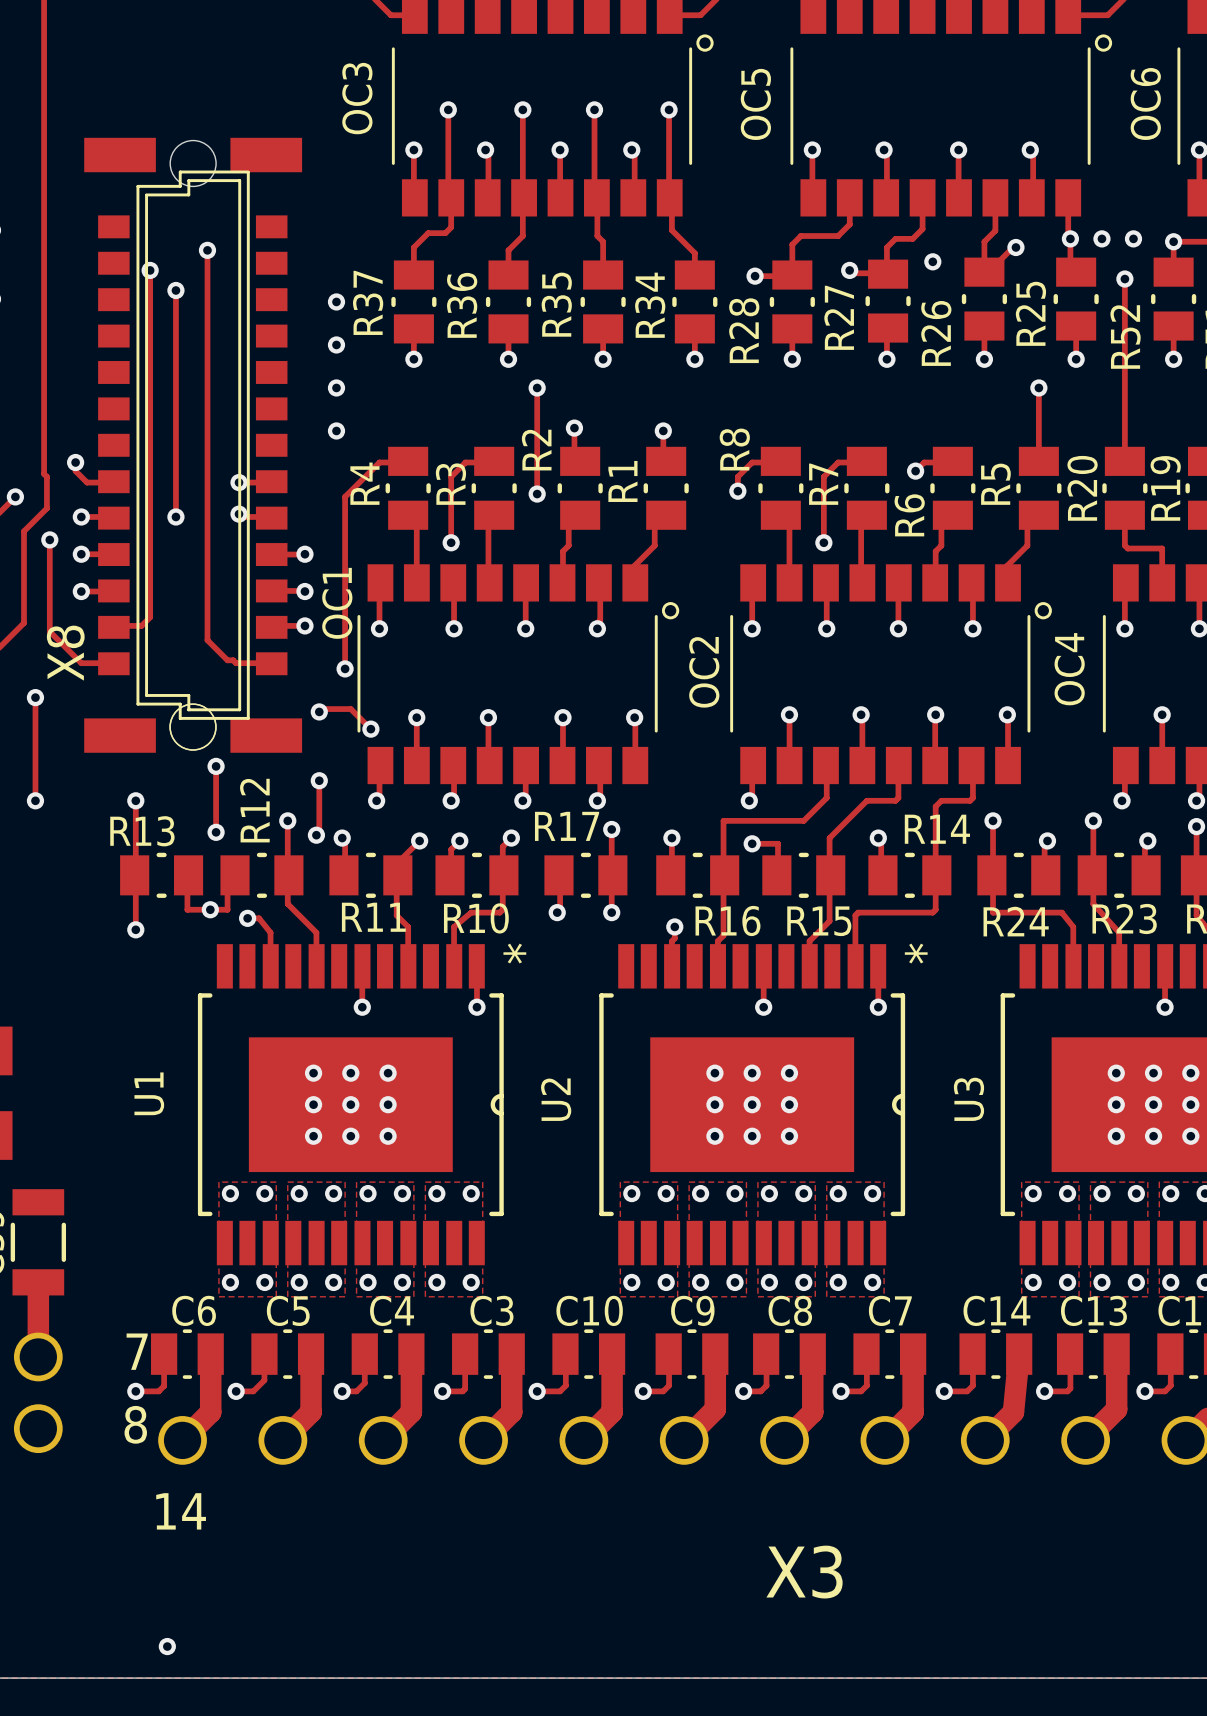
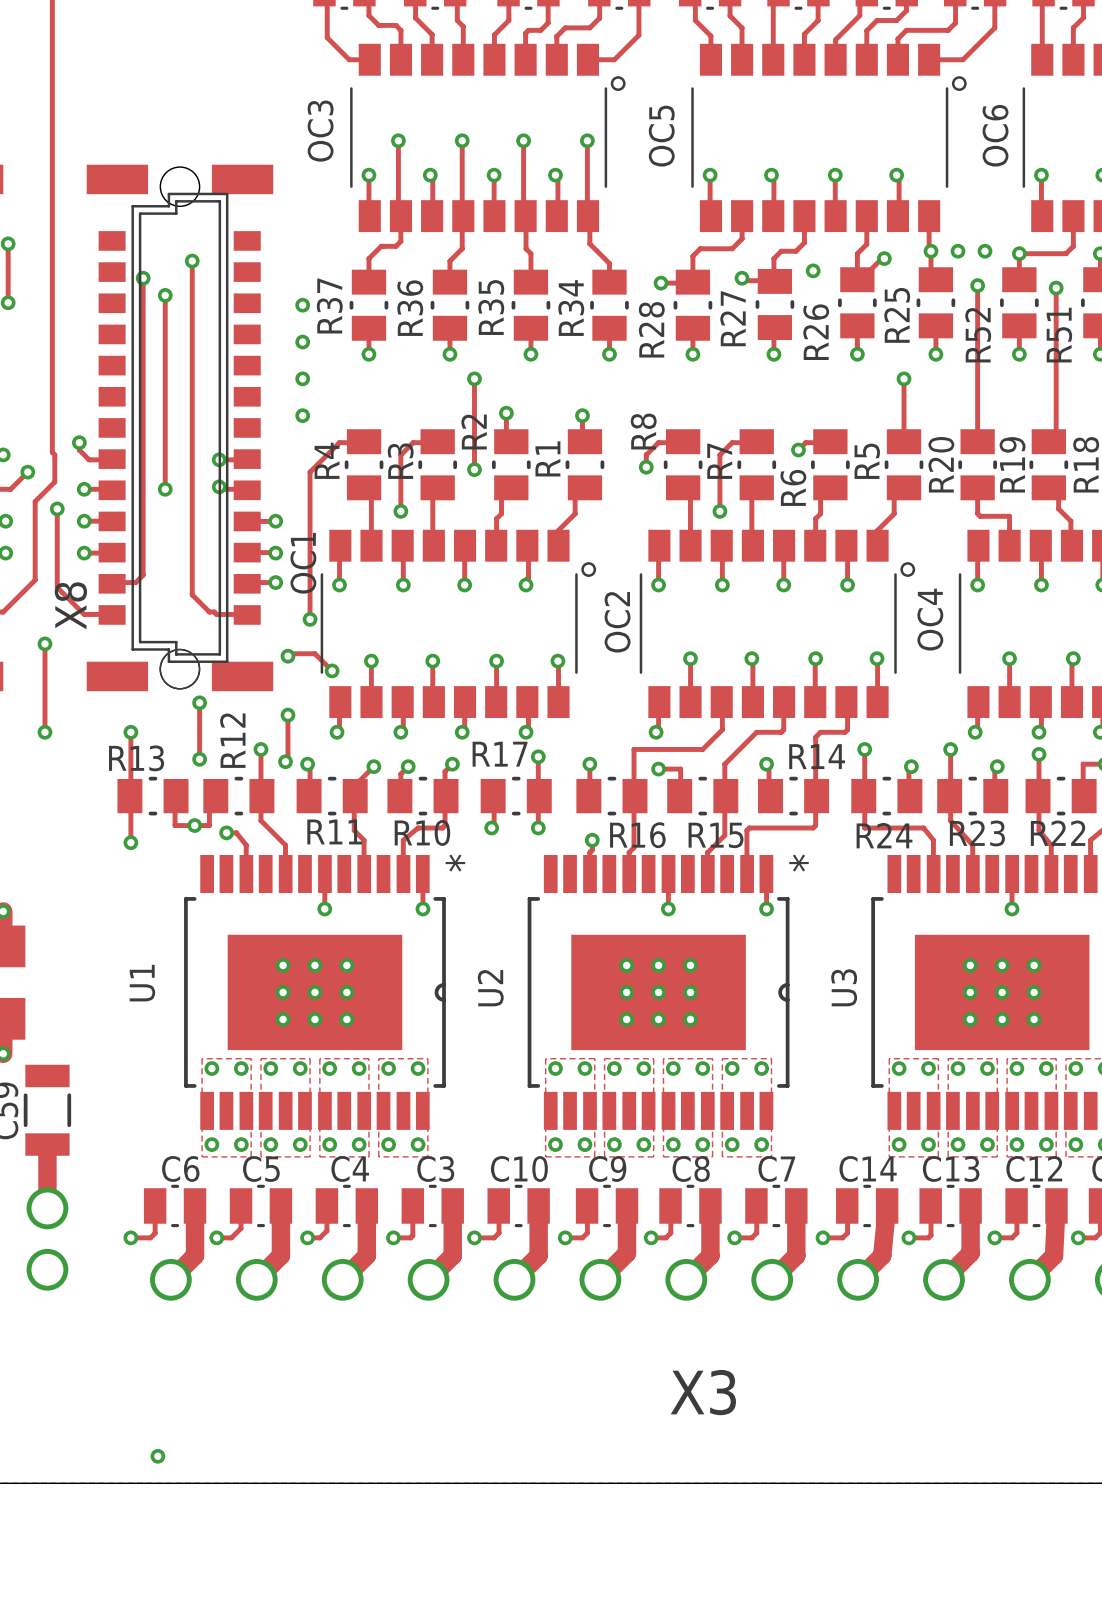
part text: 7 (137, 1351) -> none
part text: 8 (135, 1424) -> none
X3 text: 14 (181, 1511) -> none

